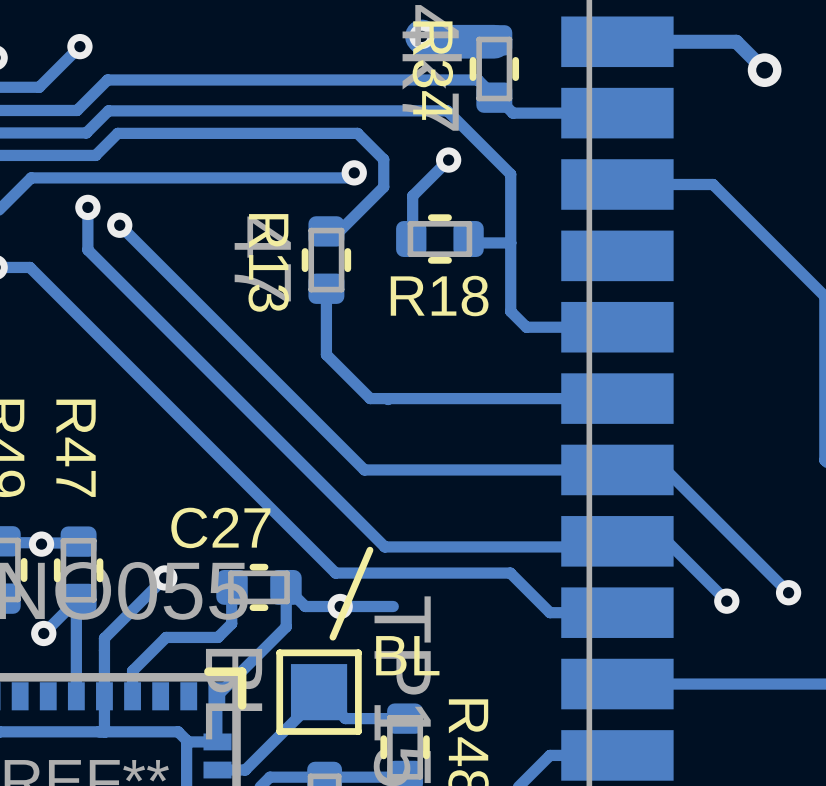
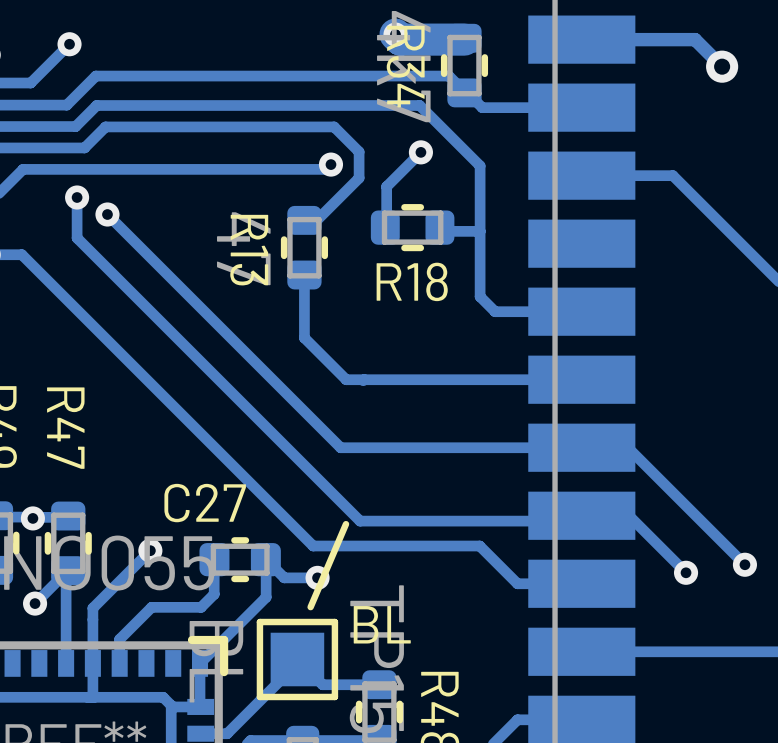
track: (393, 606) (340, 606) -> none

